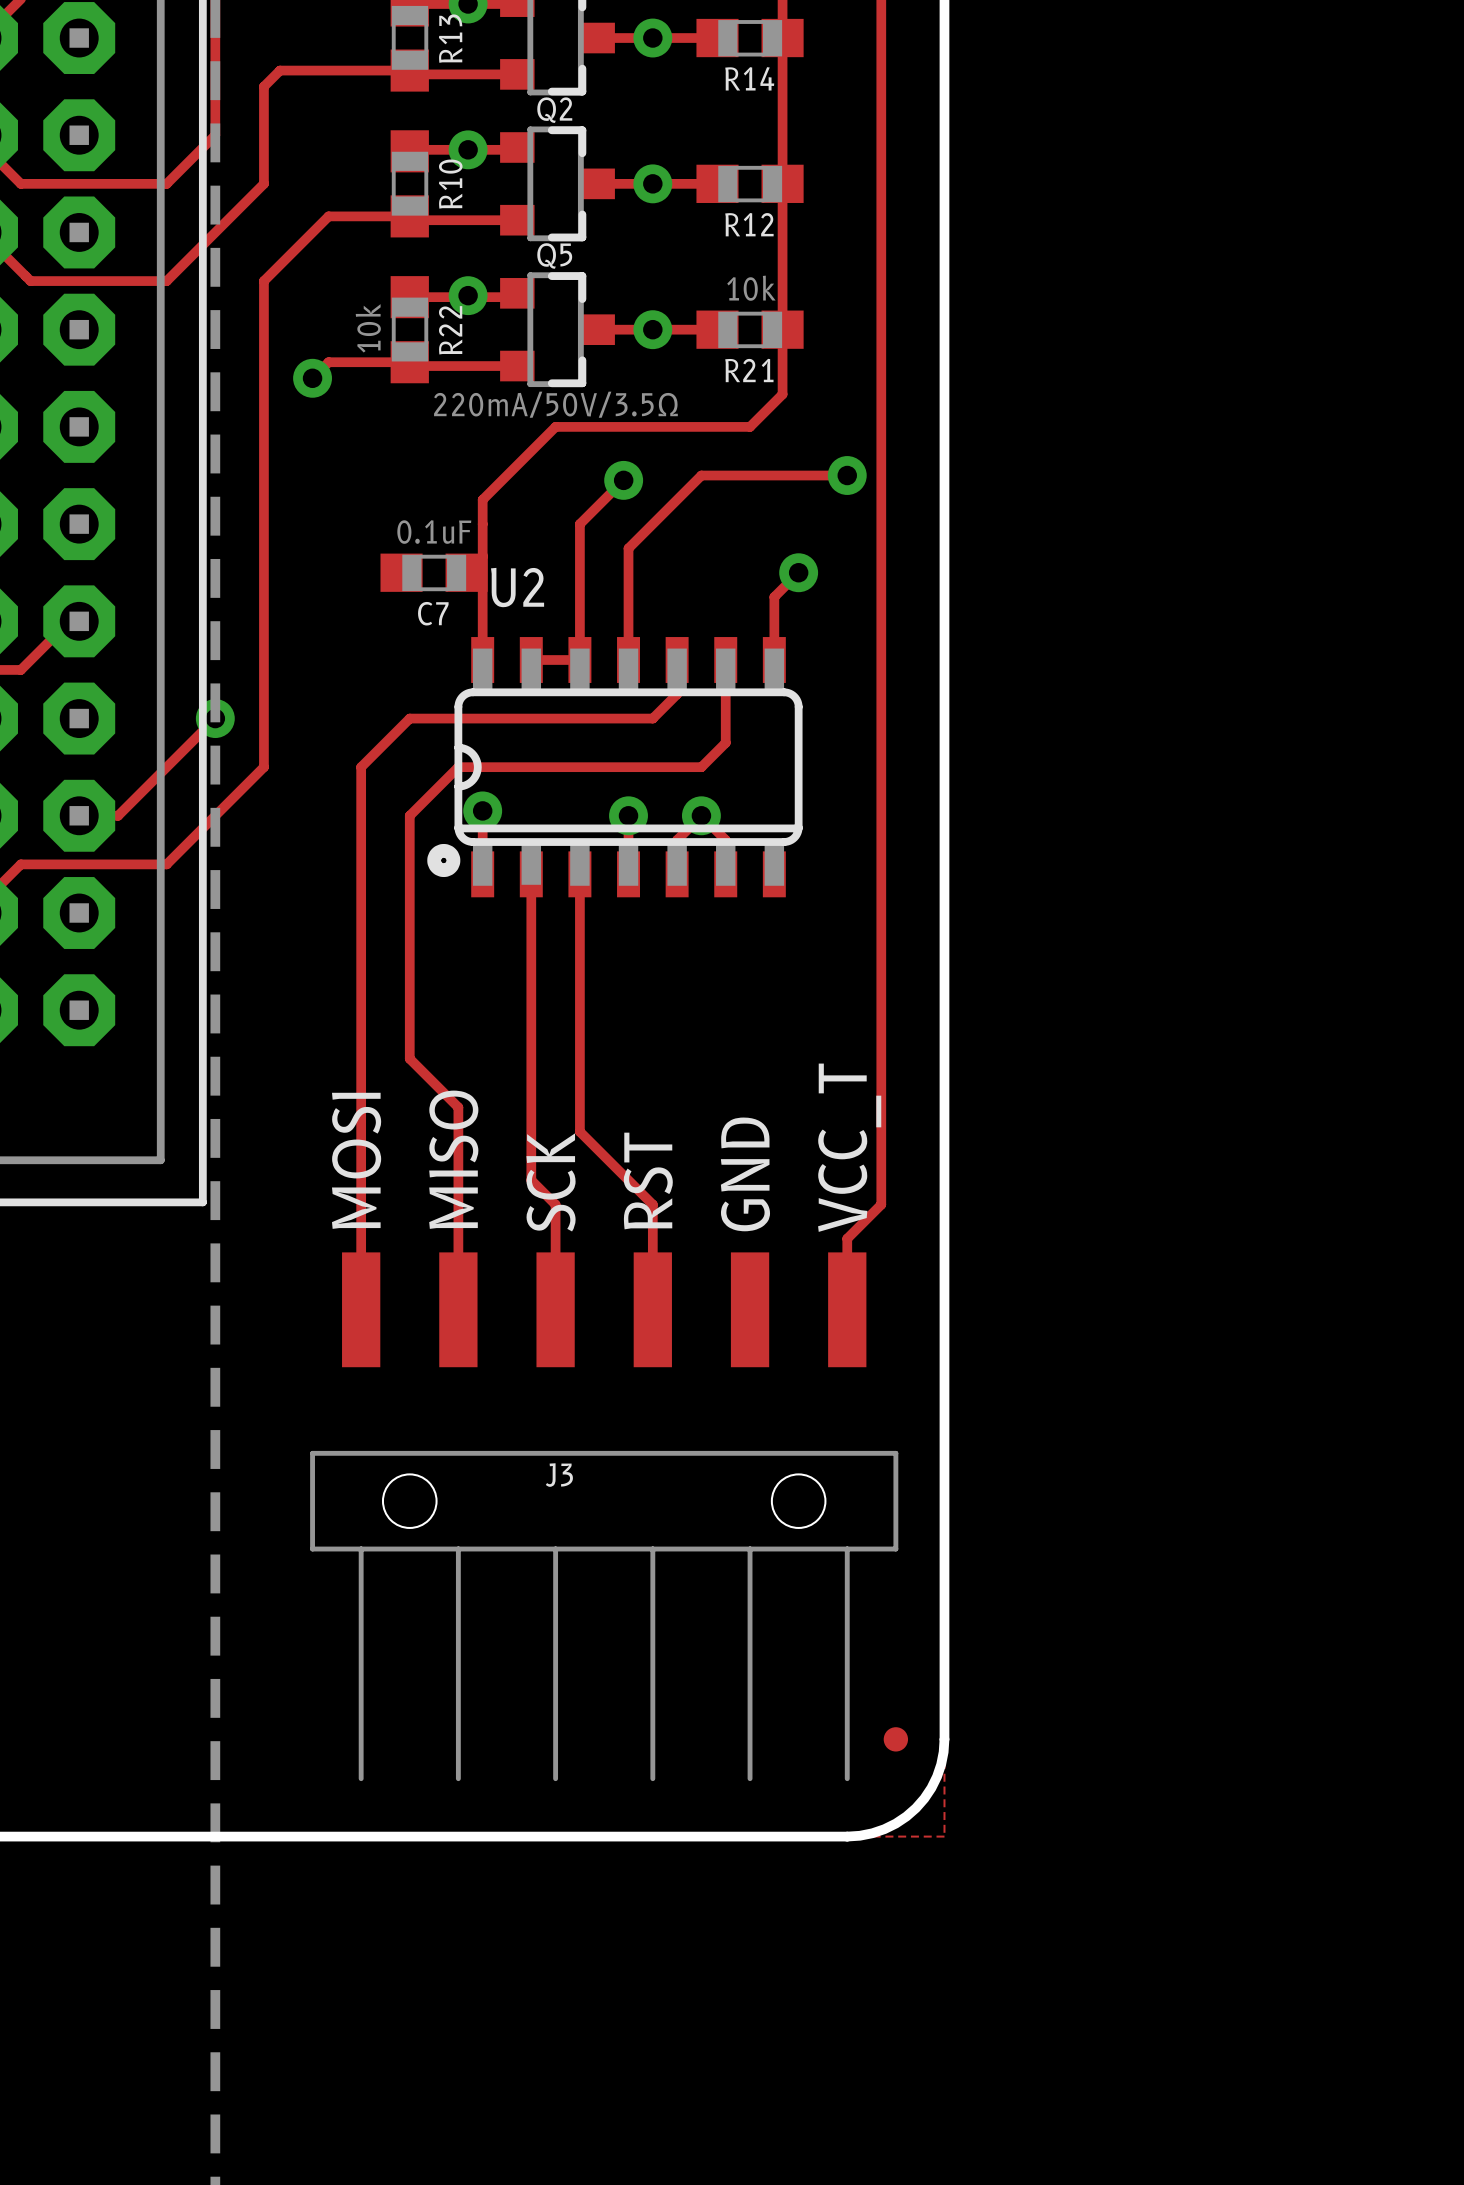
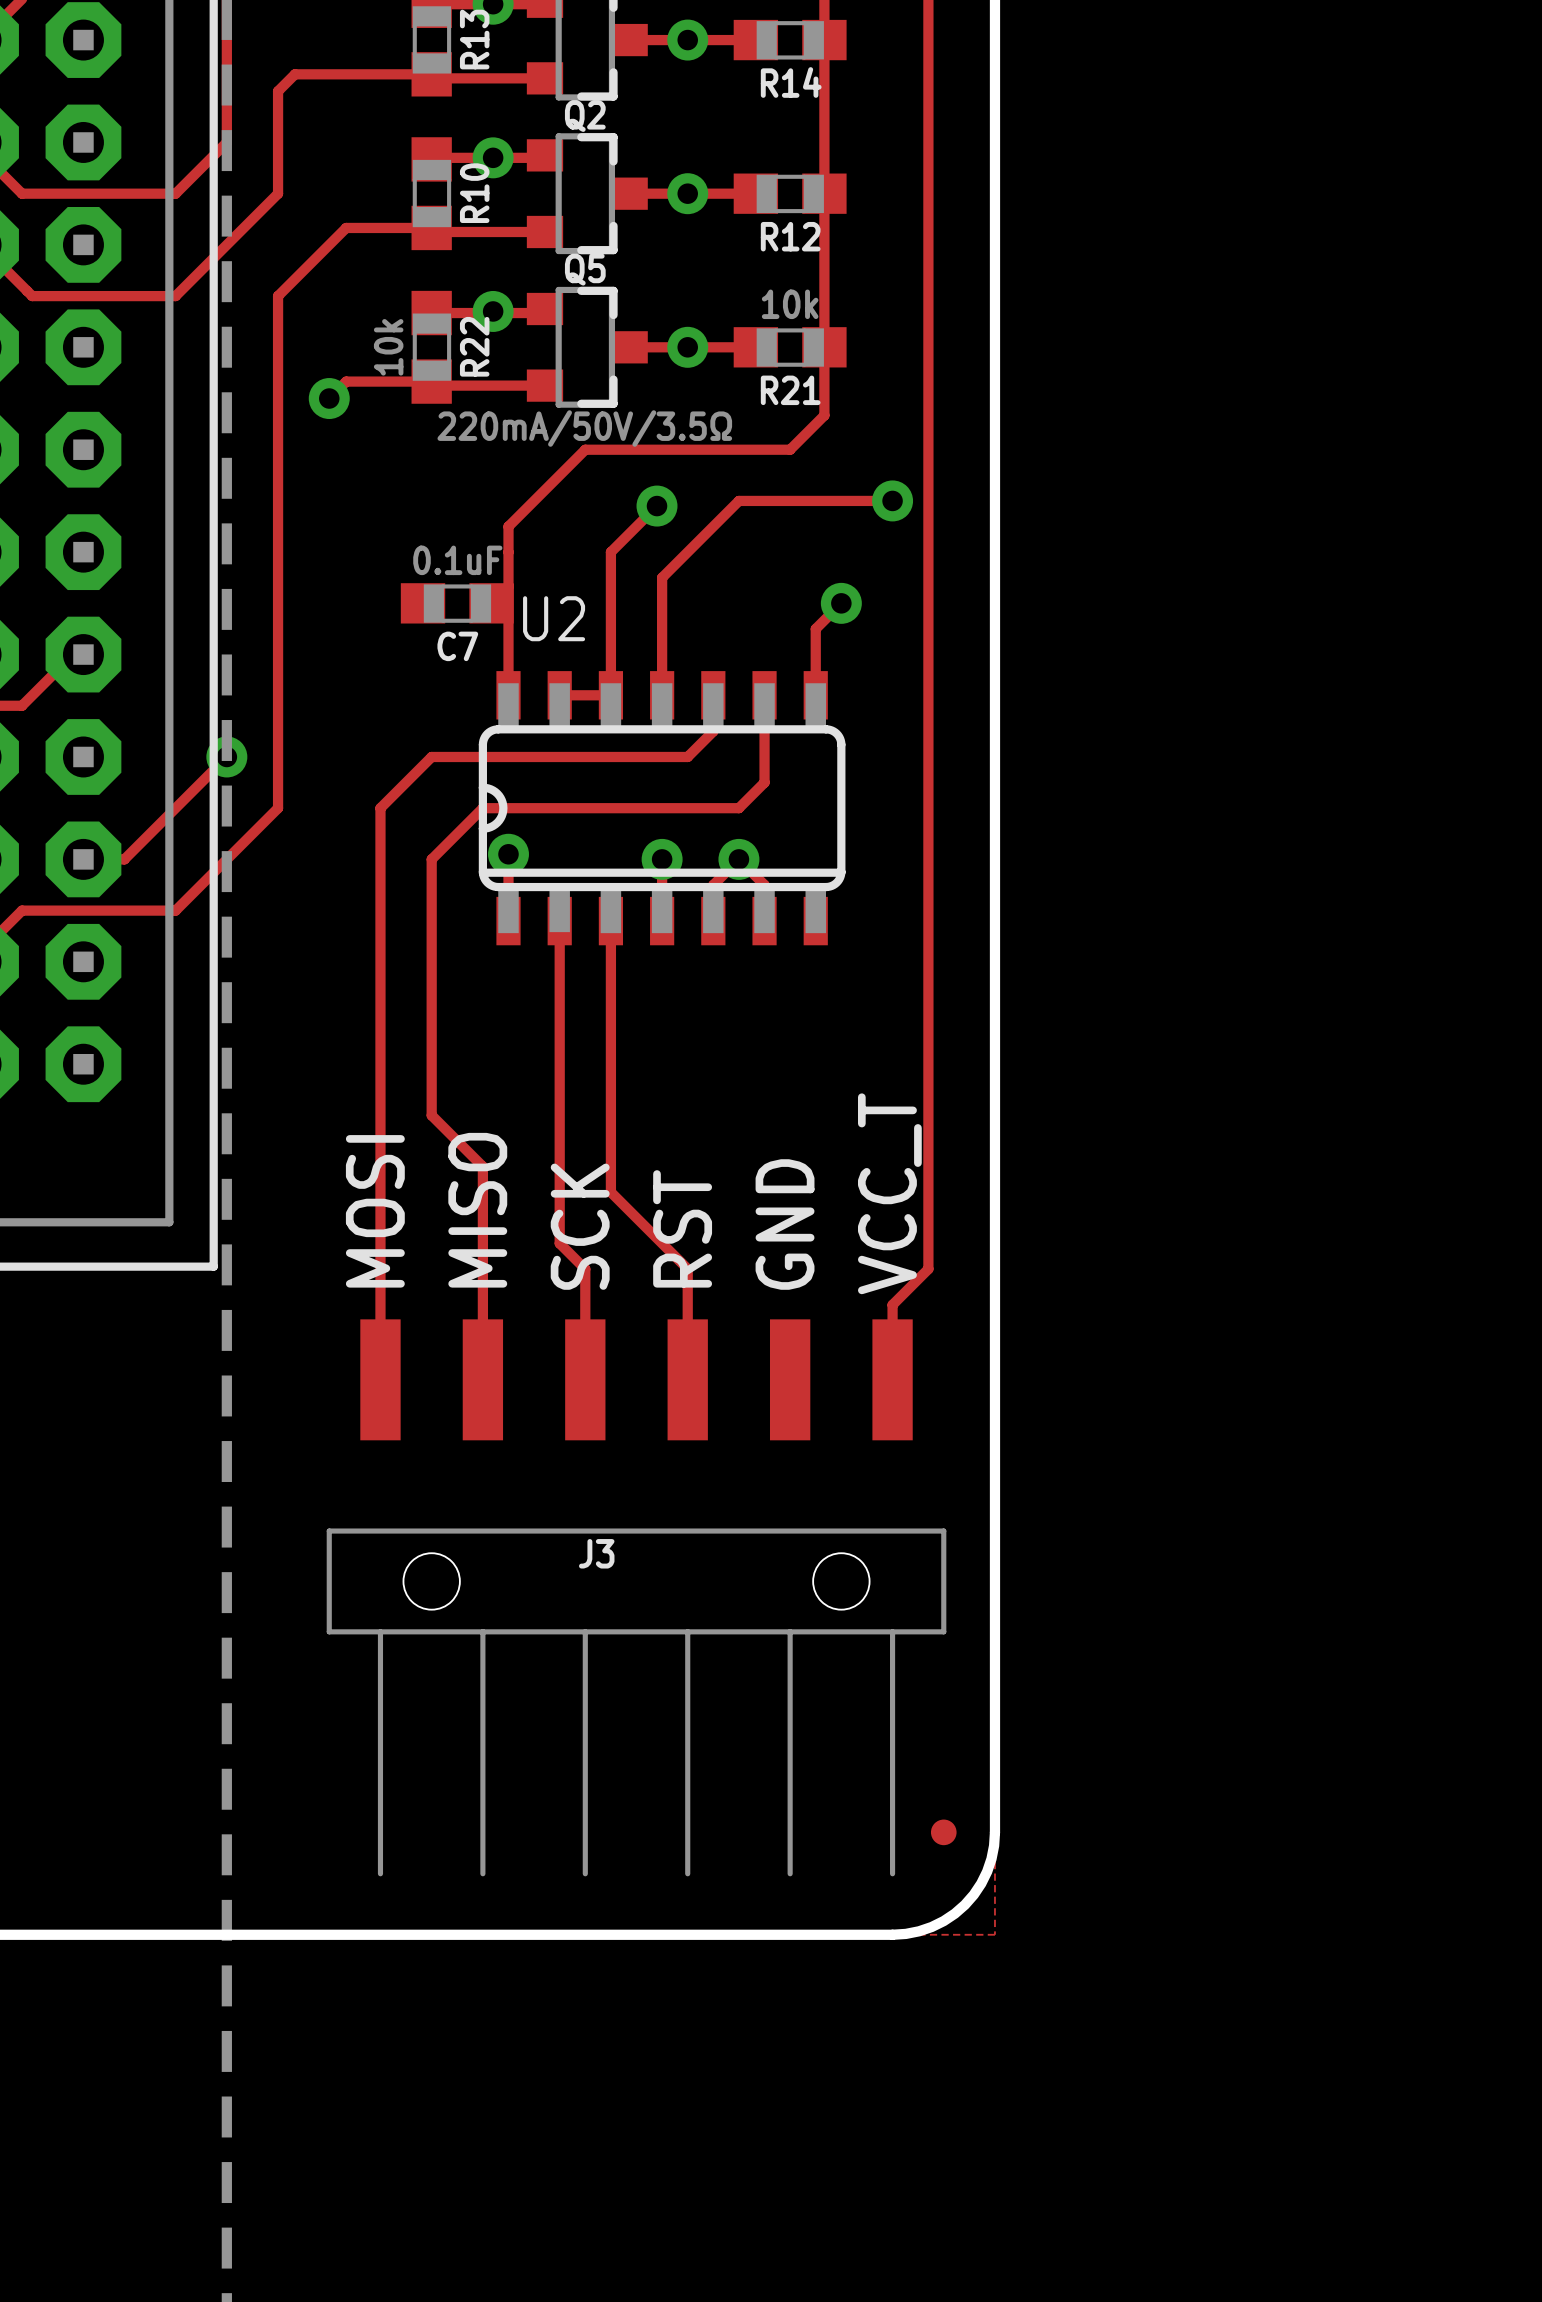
U2 footprint: [427, 637, 803, 898] -> [478, 671, 846, 946]

